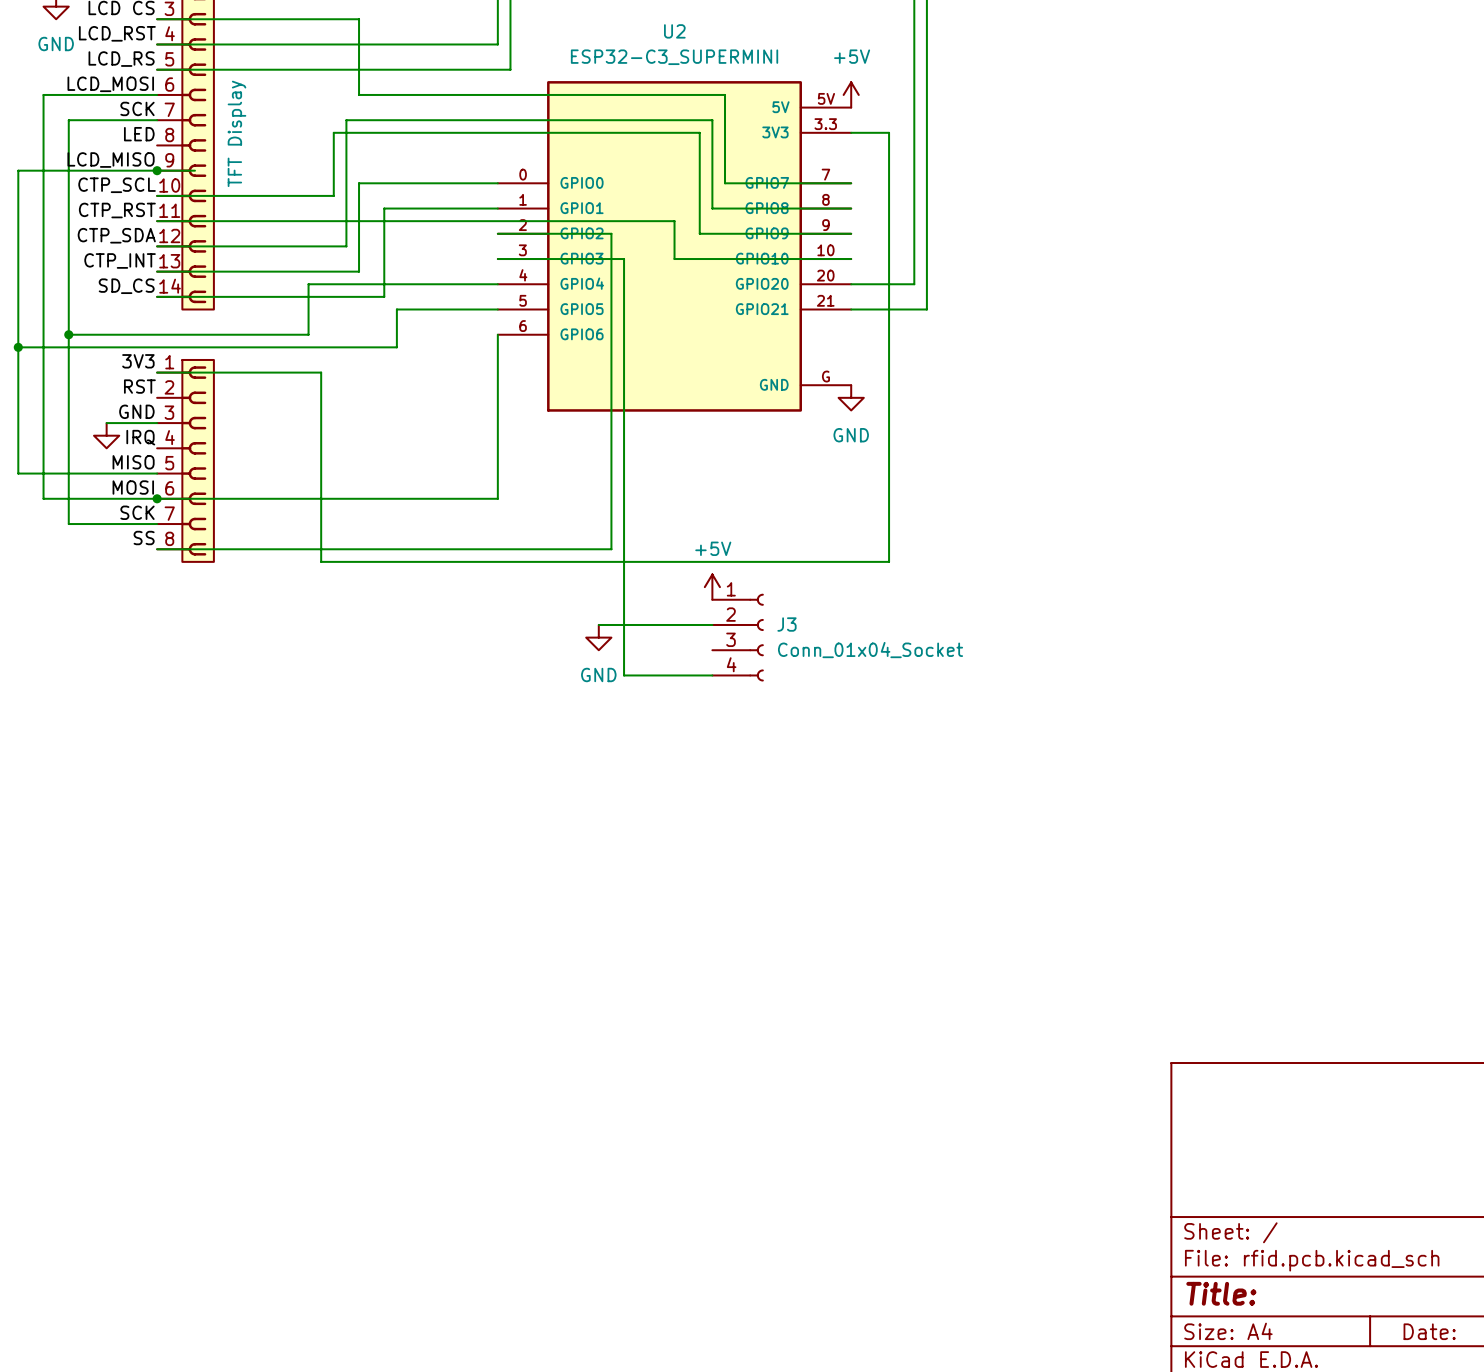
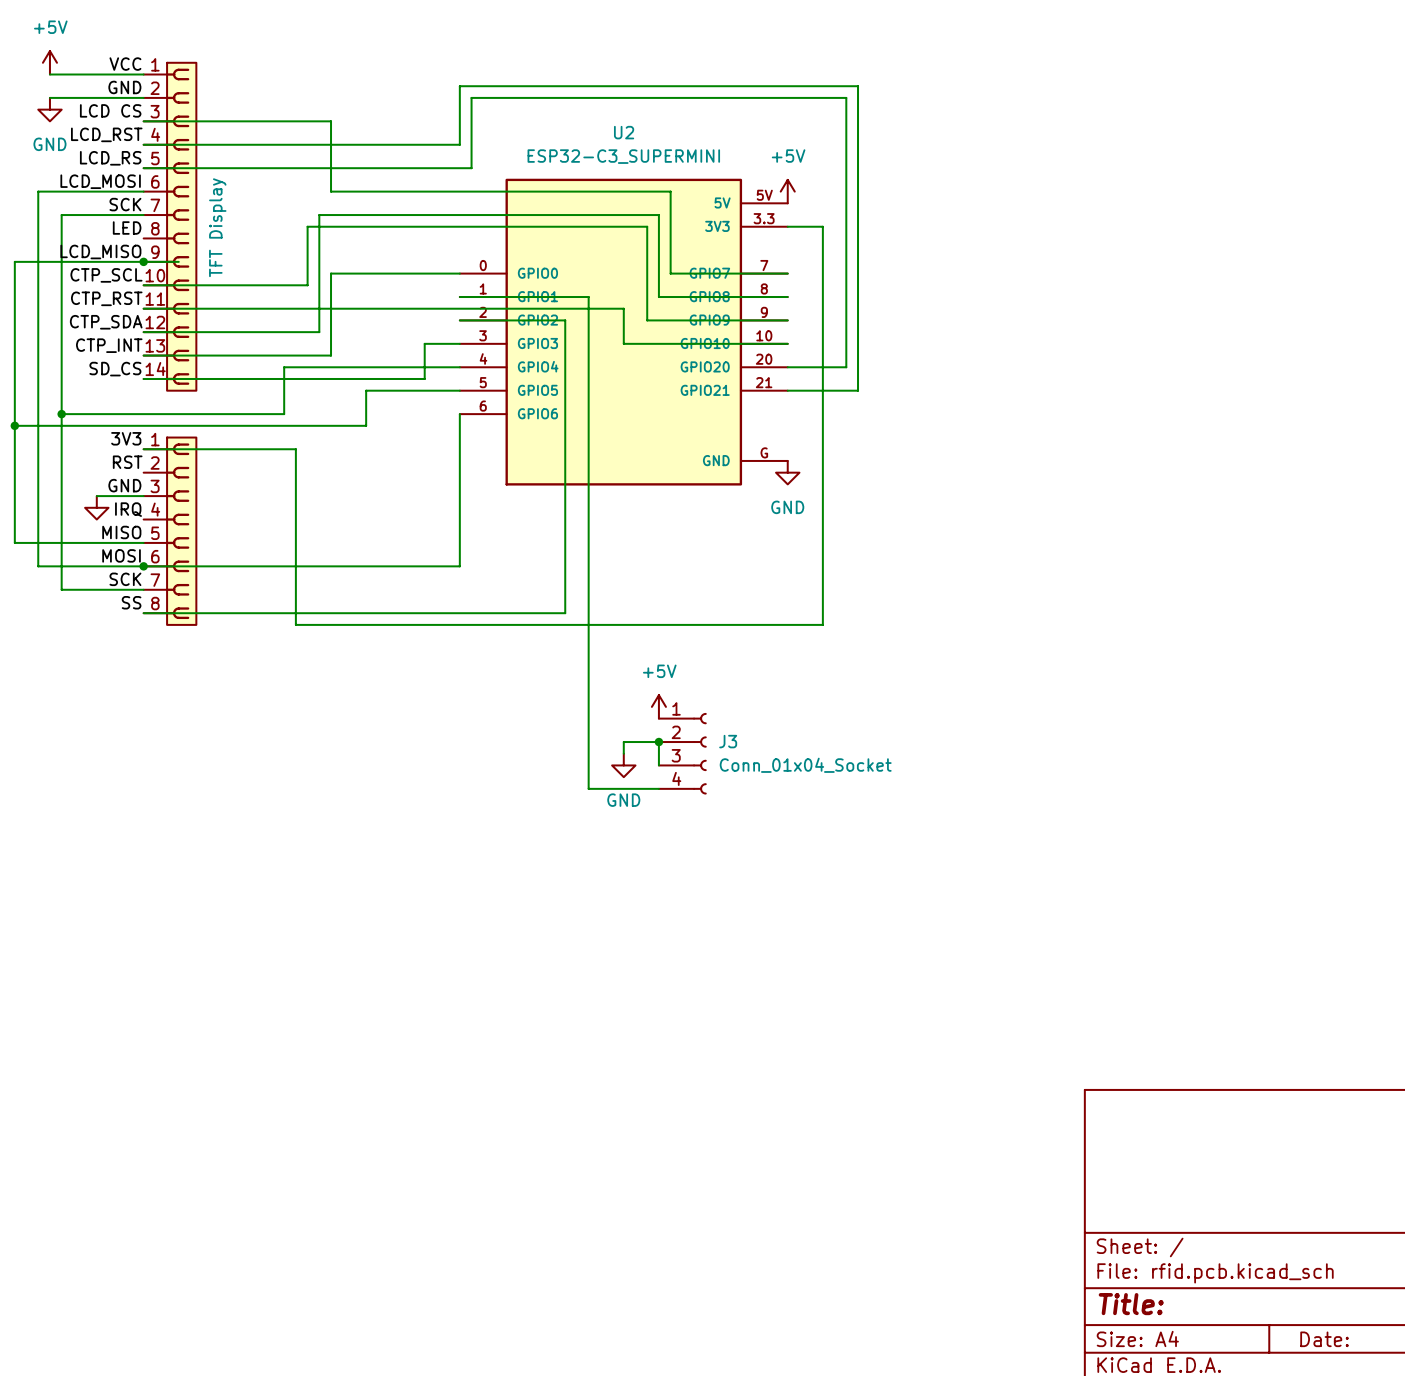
wire: (497, 208) (384, 208) (384, 296) -> (459, 343) (424, 343) (424, 378) (354, 378)
wire: none -> (459, 297) (588, 297) (588, 788) (658, 788)
wire: (497, 259) (624, 259) (624, 675) (712, 675) -> none
power symbol position: +5V (712, 587) -> +5V (658, 706)
wire: (598, 624) (712, 624) -> none
power symbol position: GND (598, 637) -> GND (623, 765)
J3 position: (738, 637) -> (682, 753)
junction: none -> (658, 742)
wire: none -> (623, 753) (623, 742) (658, 742) (658, 765)

